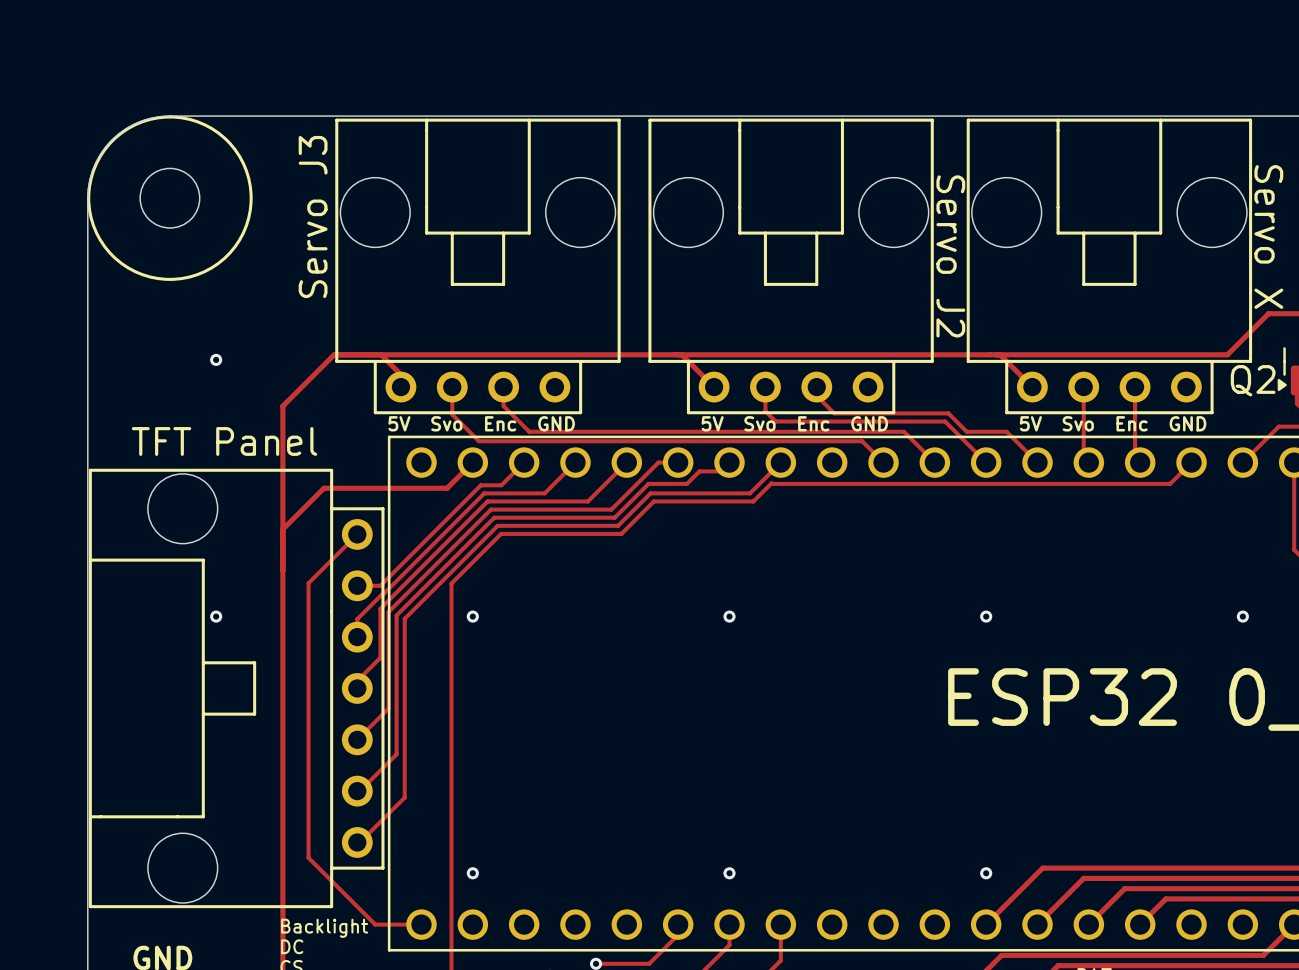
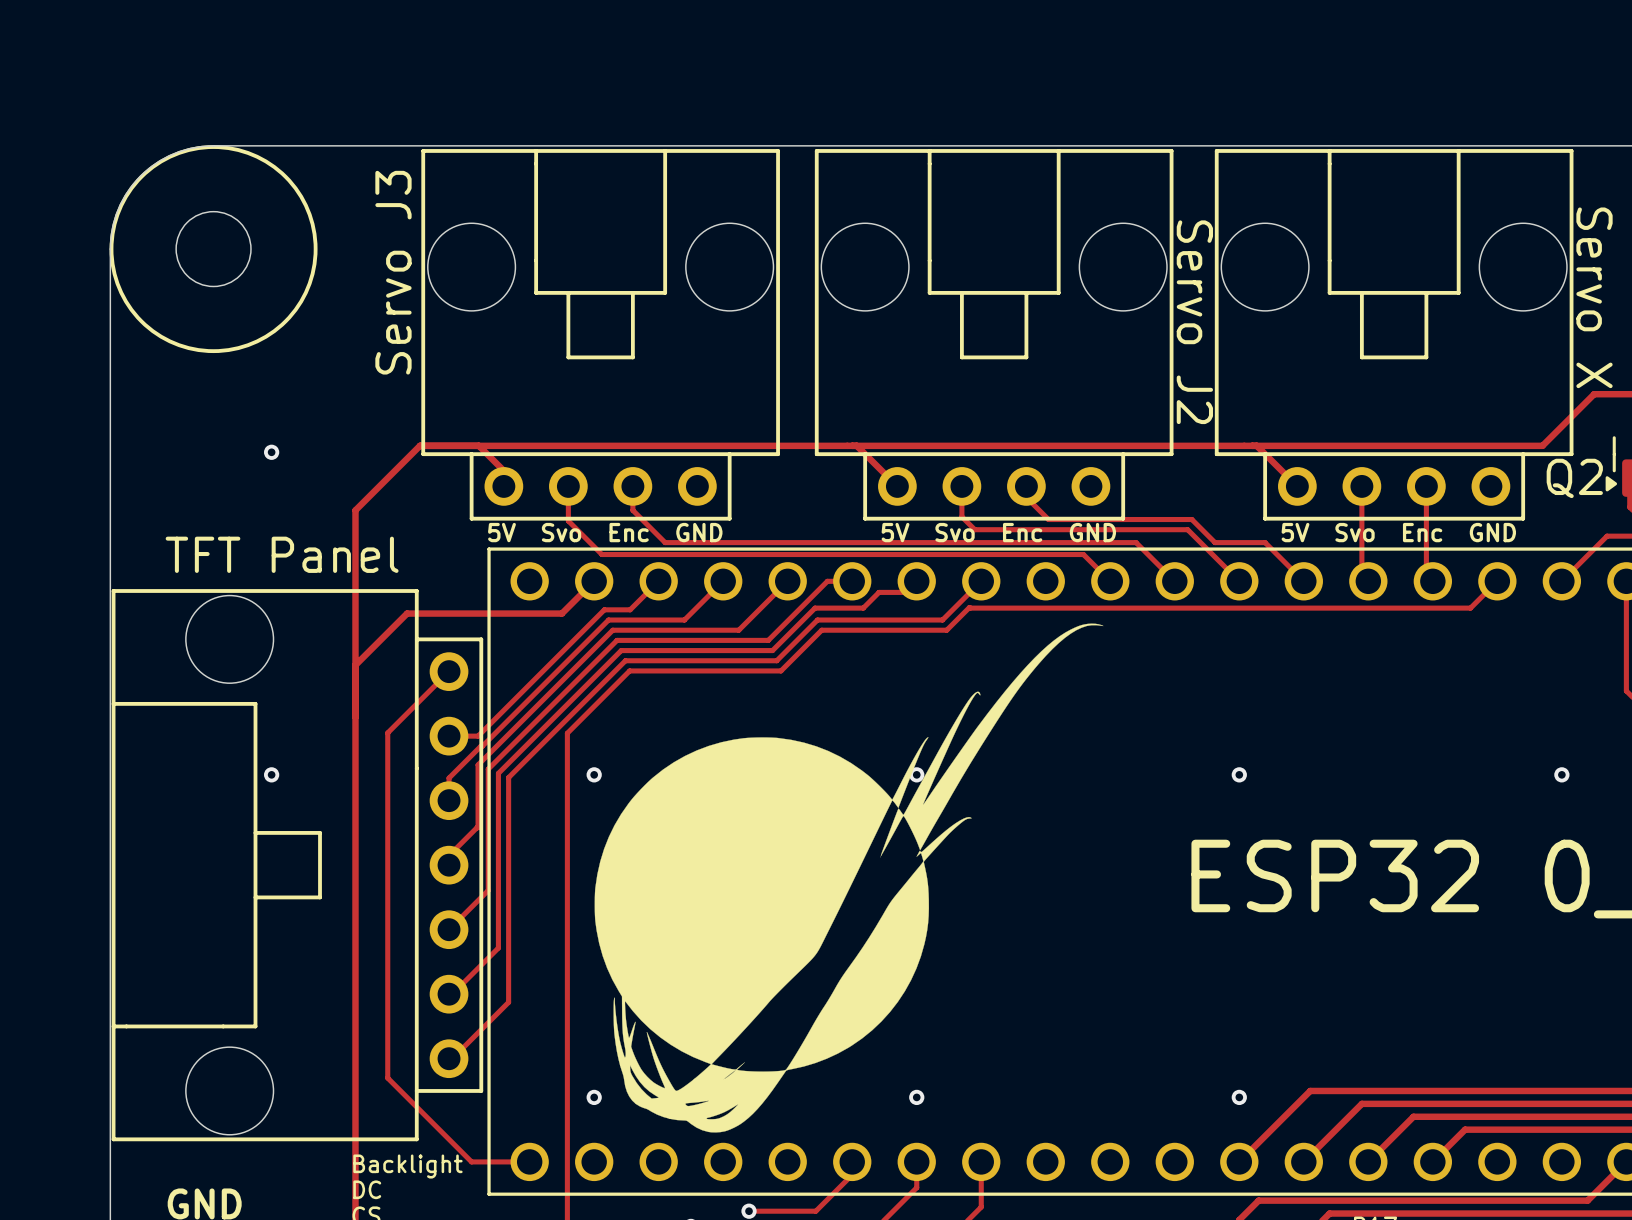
drawing: none -> [594, 623, 1104, 1133]

